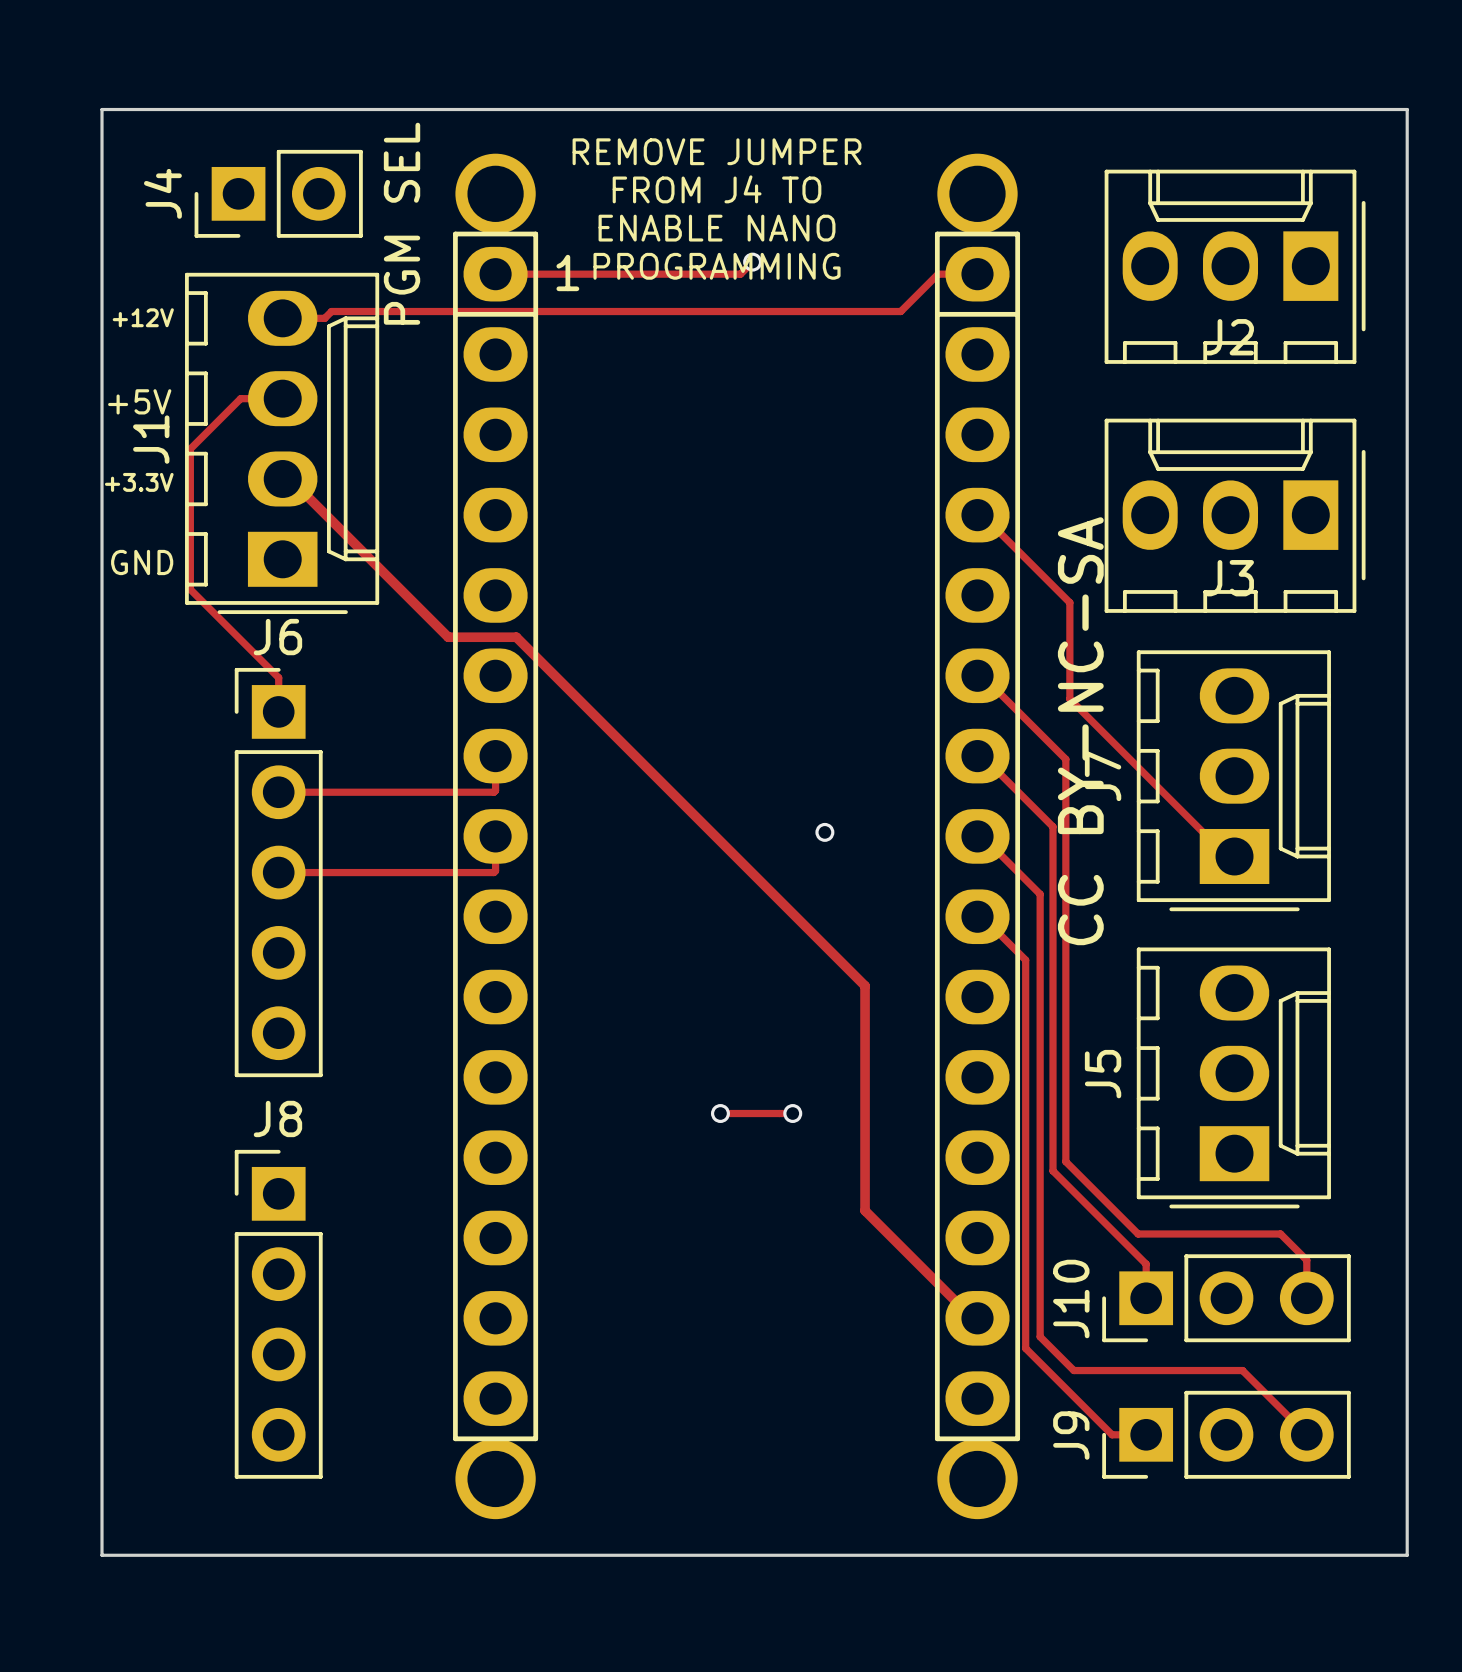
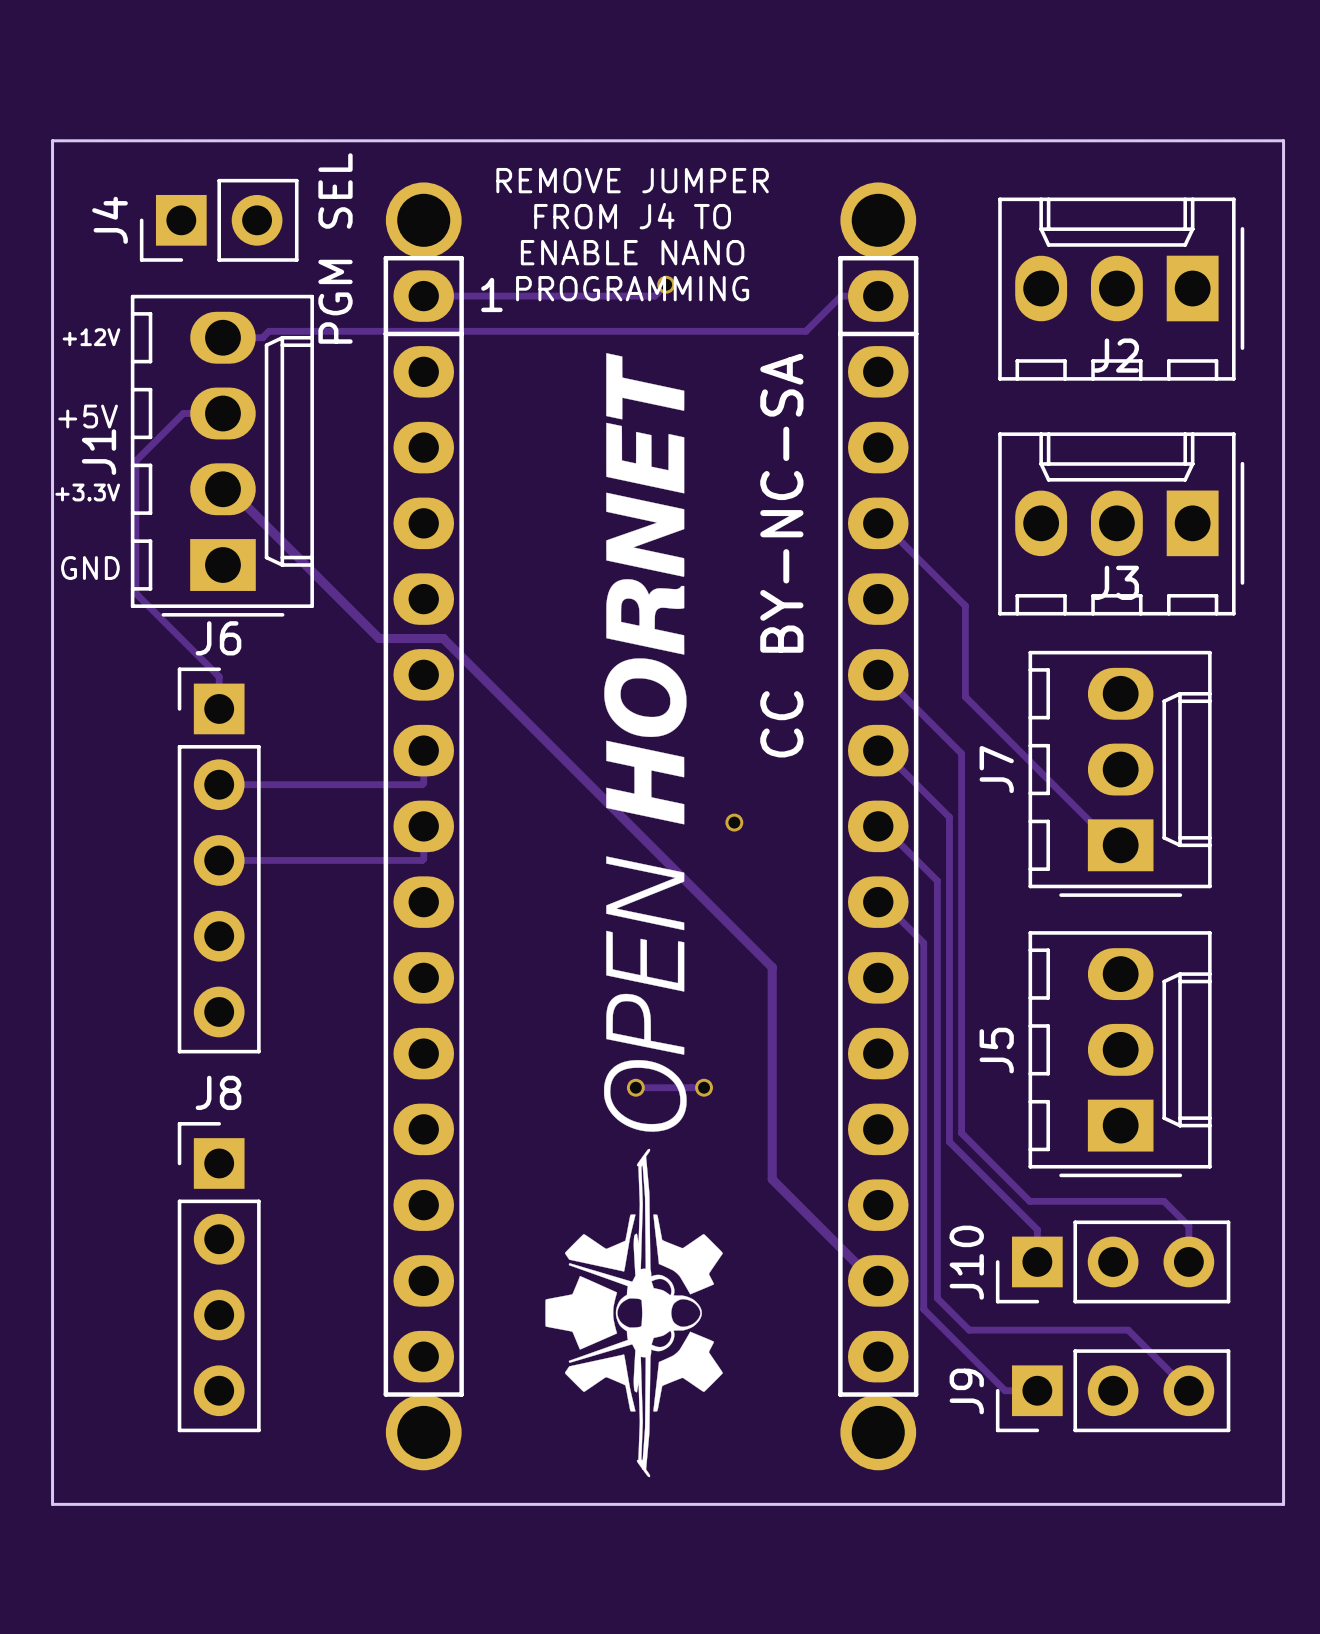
drawing: none -> [545, 353, 723, 1478]
text position: CC BY-NC-SA (1080, 731) -> CC BY-NC-SA (781, 555)

